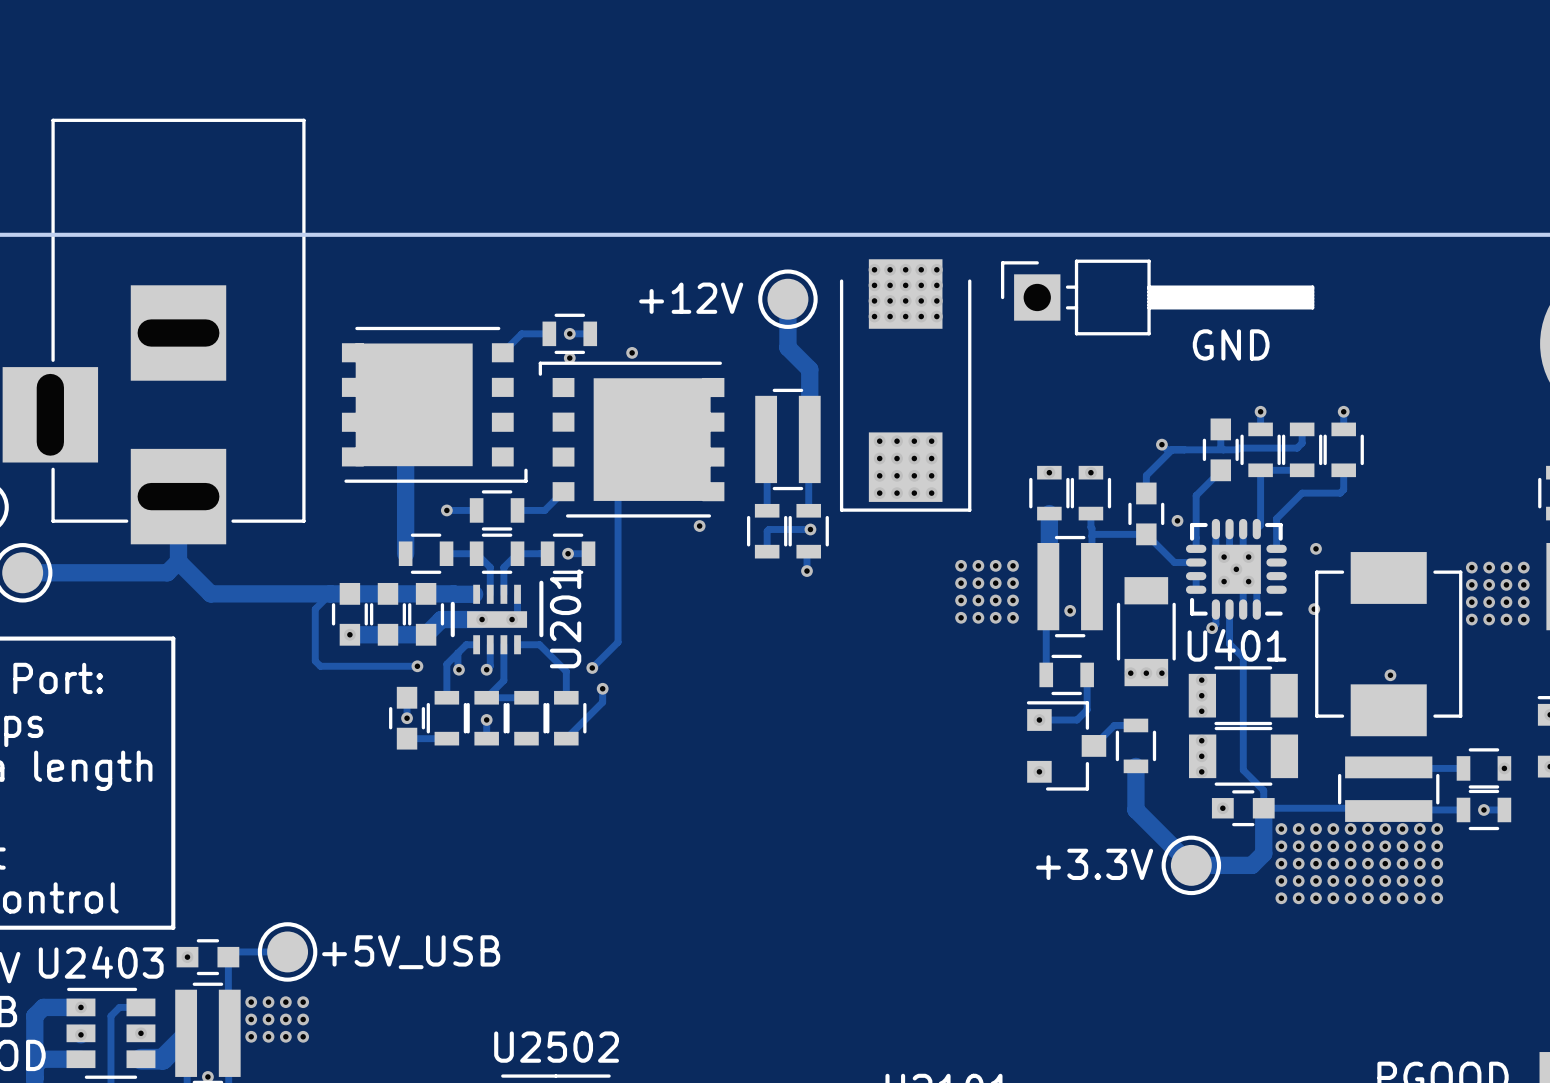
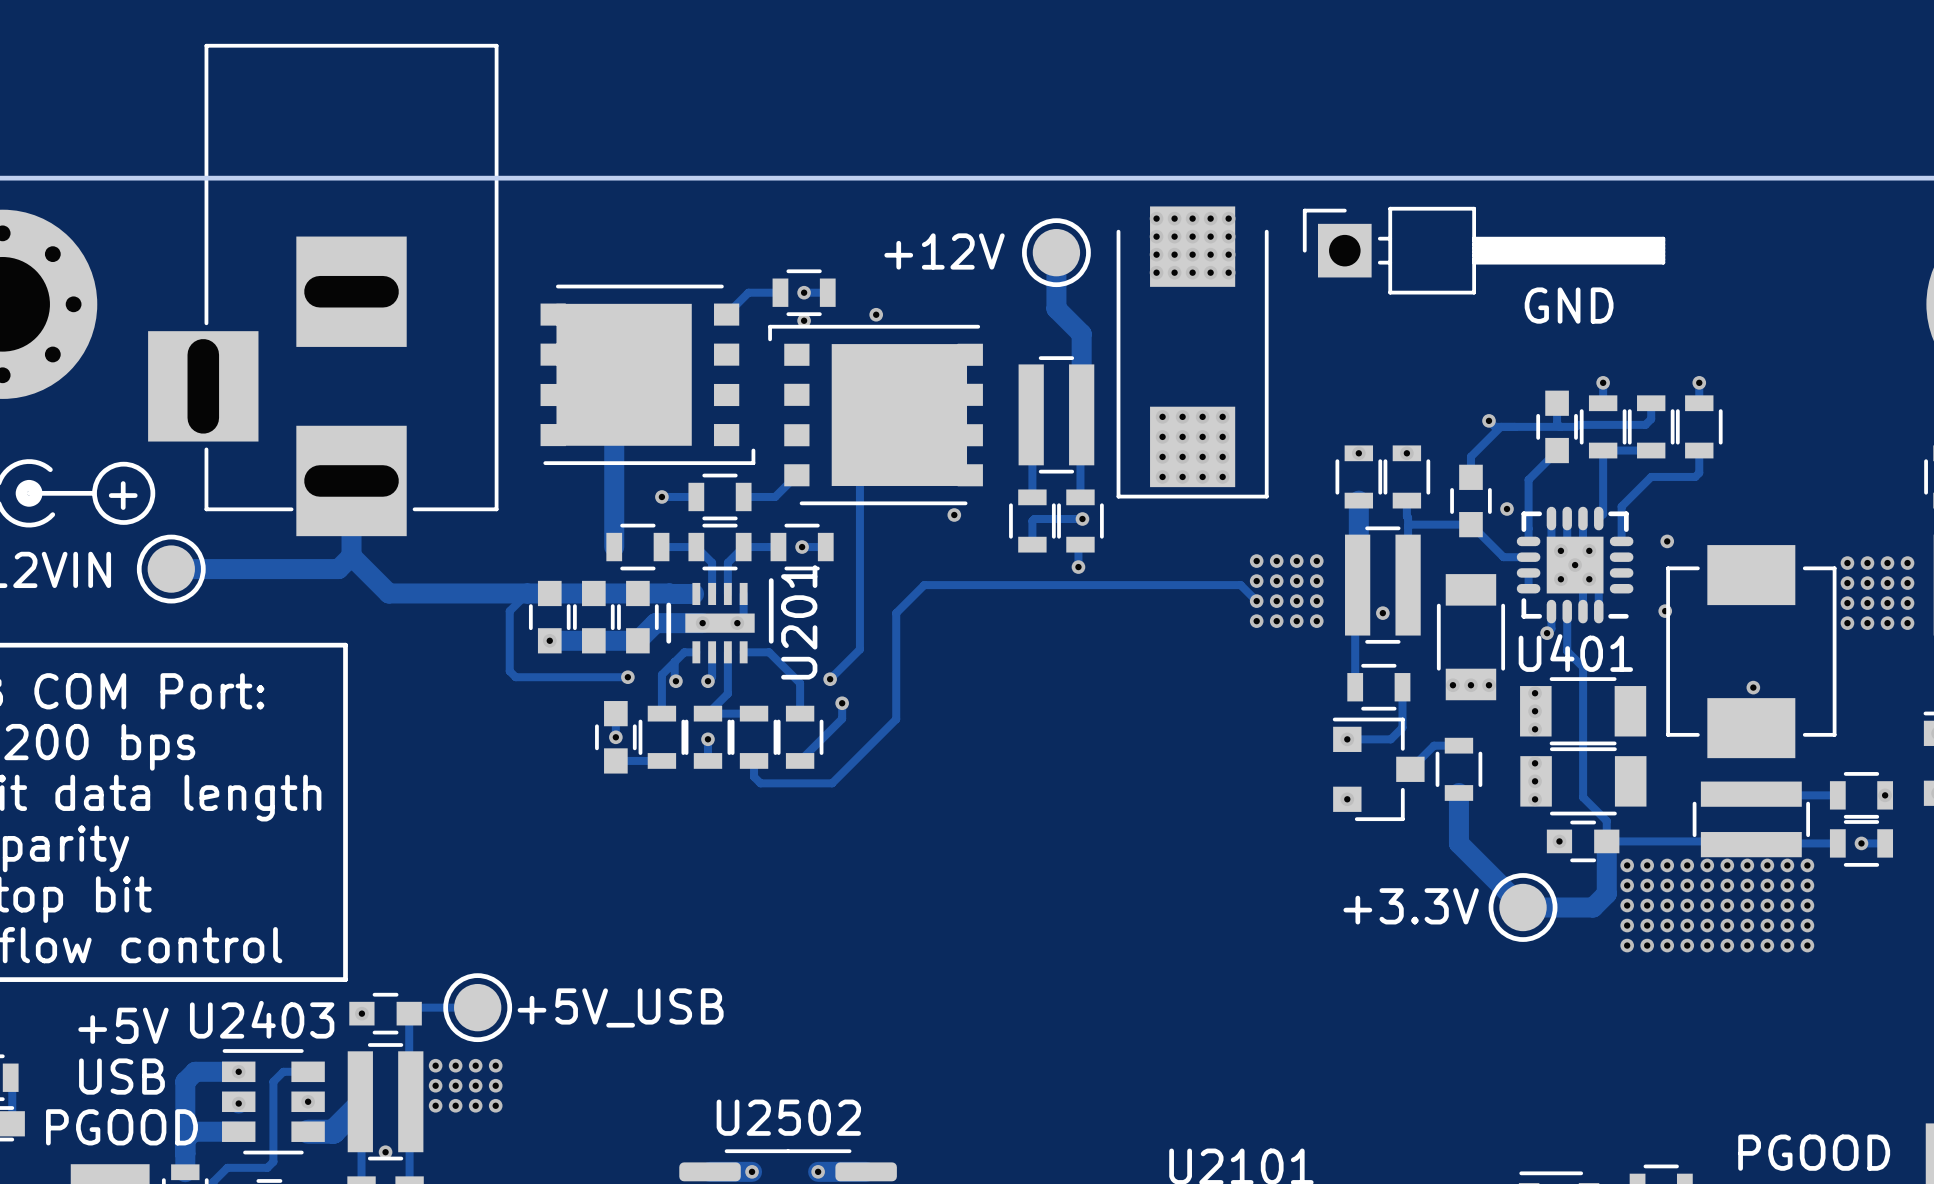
track: none -> (1256, 601) (1240, 585) (924, 585) (896, 613) (896, 719) (832, 783) (760, 783) (754, 776) (754, 760)

